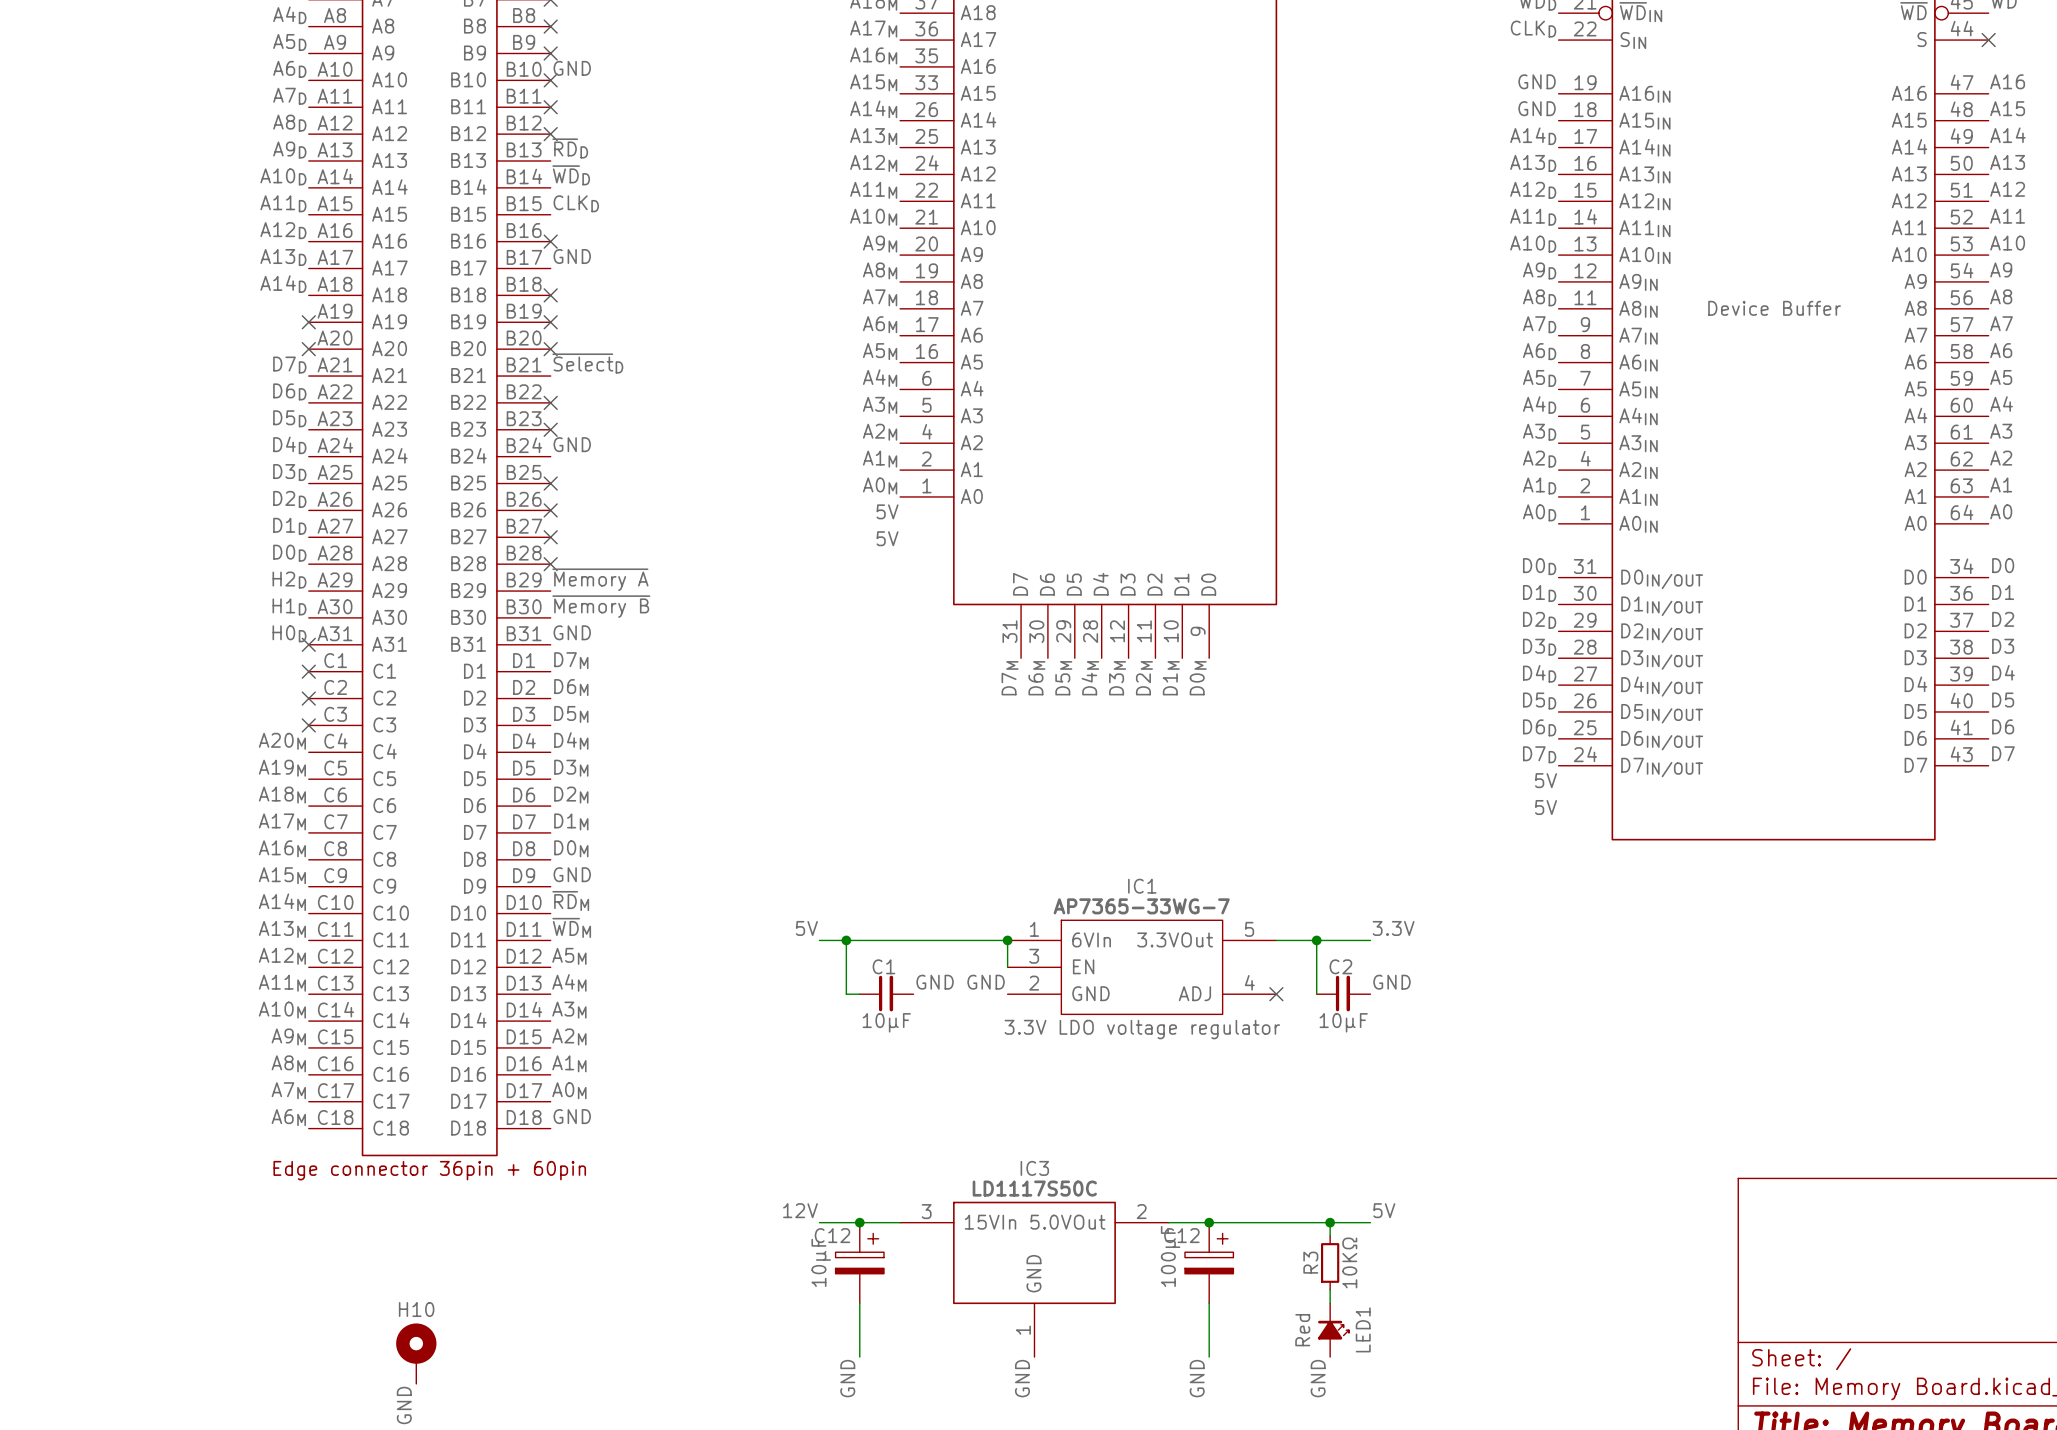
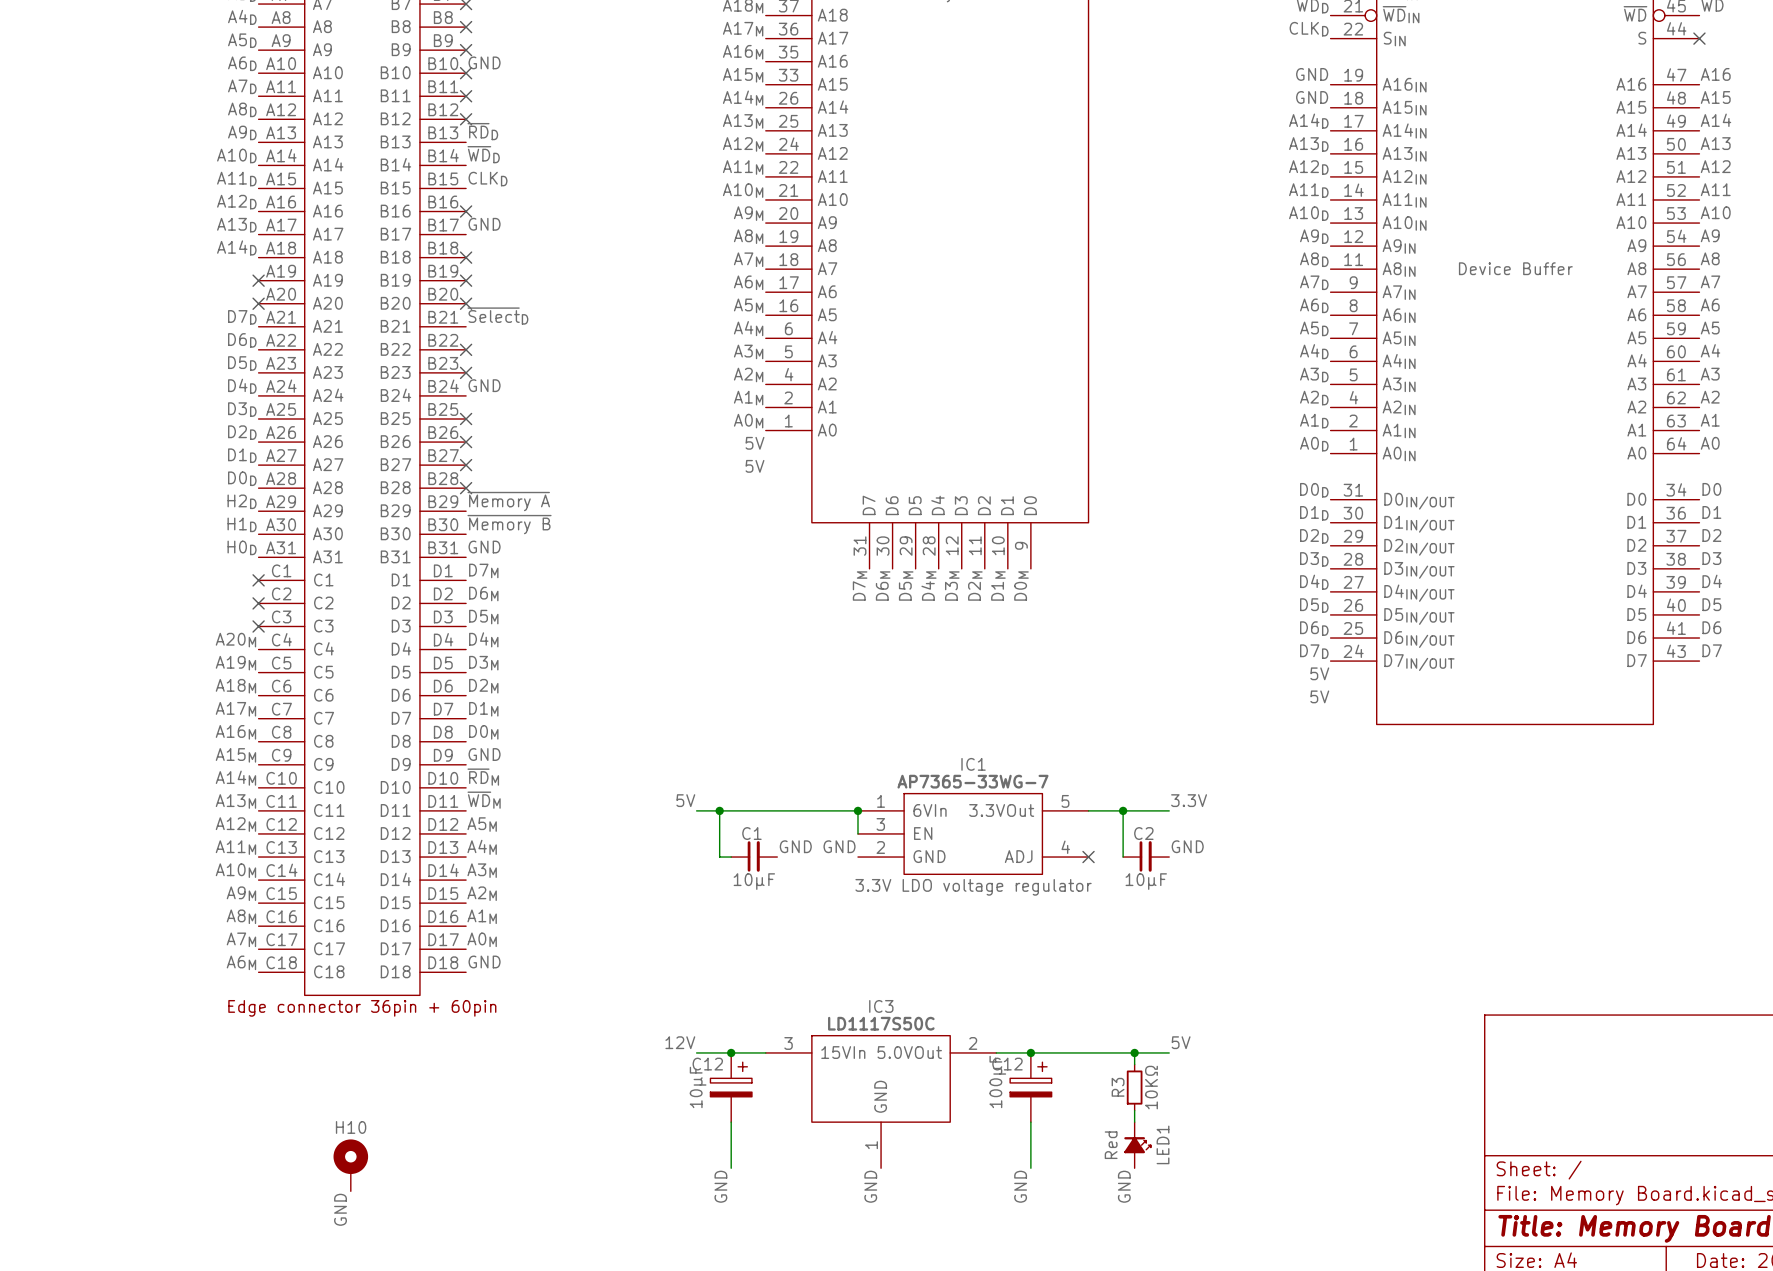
no-connect mark: (308, 644) -> none

